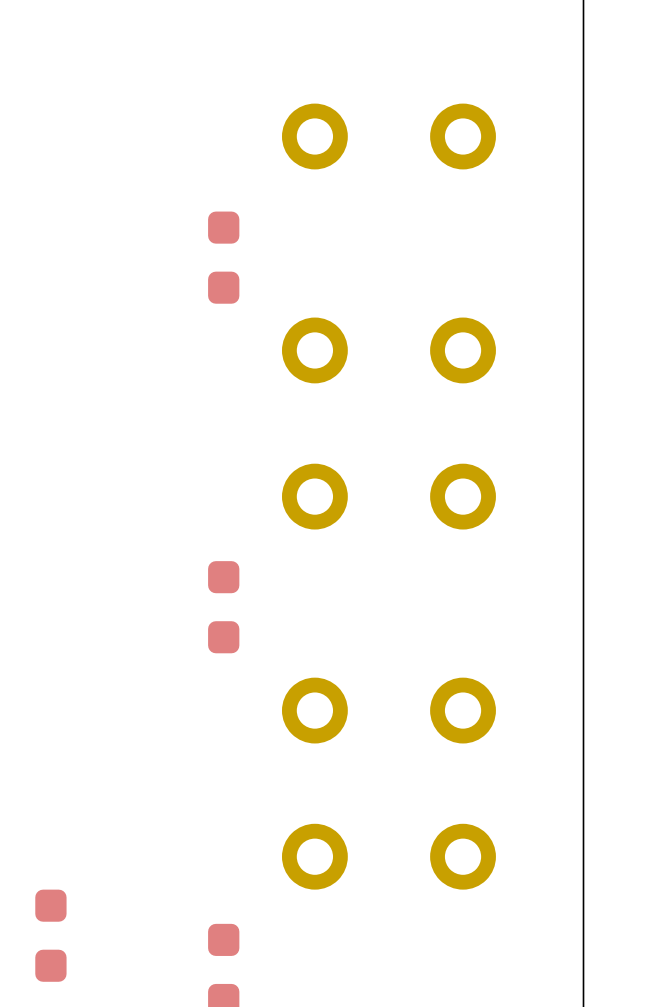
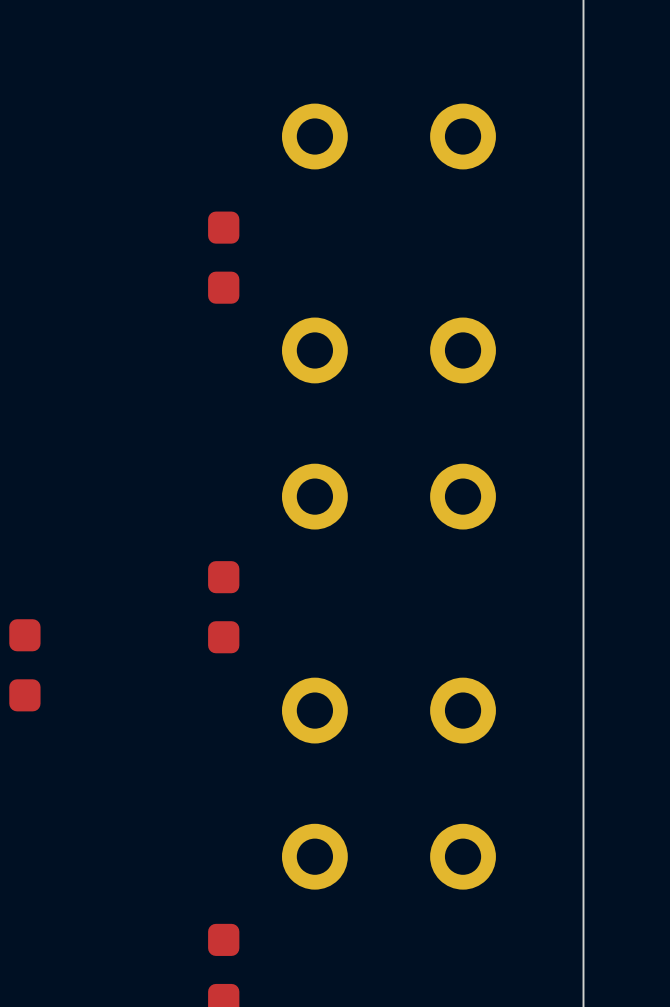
part position: (50, 935) -> (24, 665)

